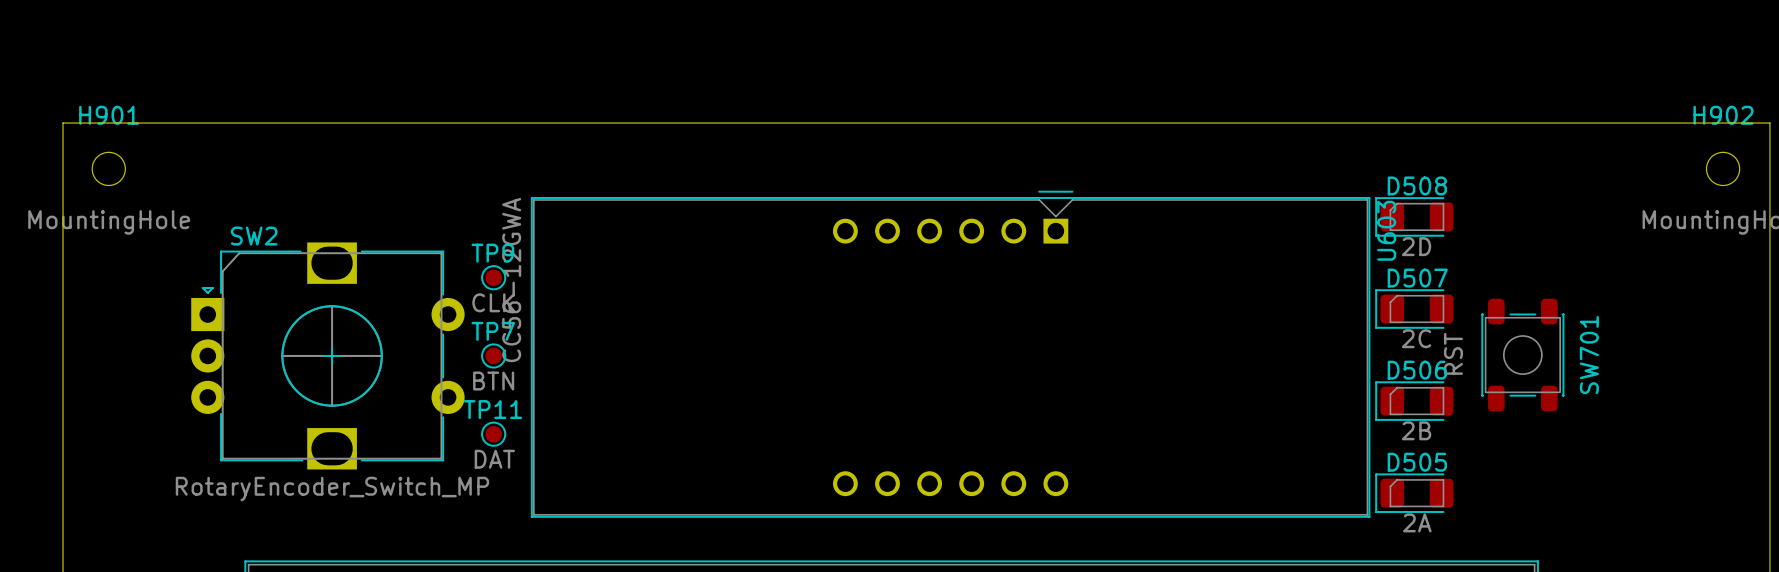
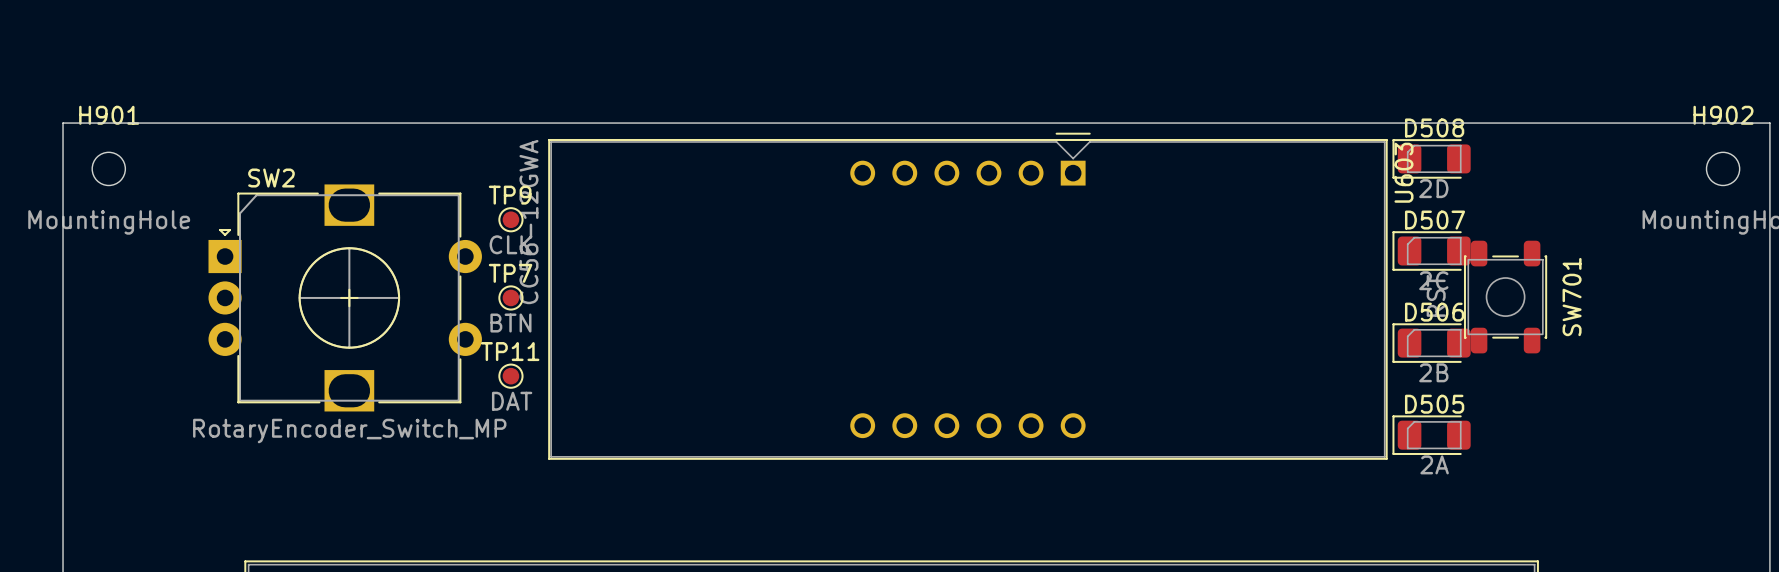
D508 position: (1414, 216) -> (1431, 158)
TP9 position: (493, 277) -> (510, 219)
D507 position: (1414, 309) -> (1431, 251)
U603 position: (950, 354) -> (967, 296)
SW2 position: (327, 355) -> (345, 297)
TP7 position: (493, 355) -> (510, 297)
SW701 position: (1522, 355) -> (1505, 297)
D506 position: (1414, 401) -> (1431, 343)
TP11 position: (493, 434) -> (510, 376)
D505 position: (1414, 493) -> (1431, 435)

